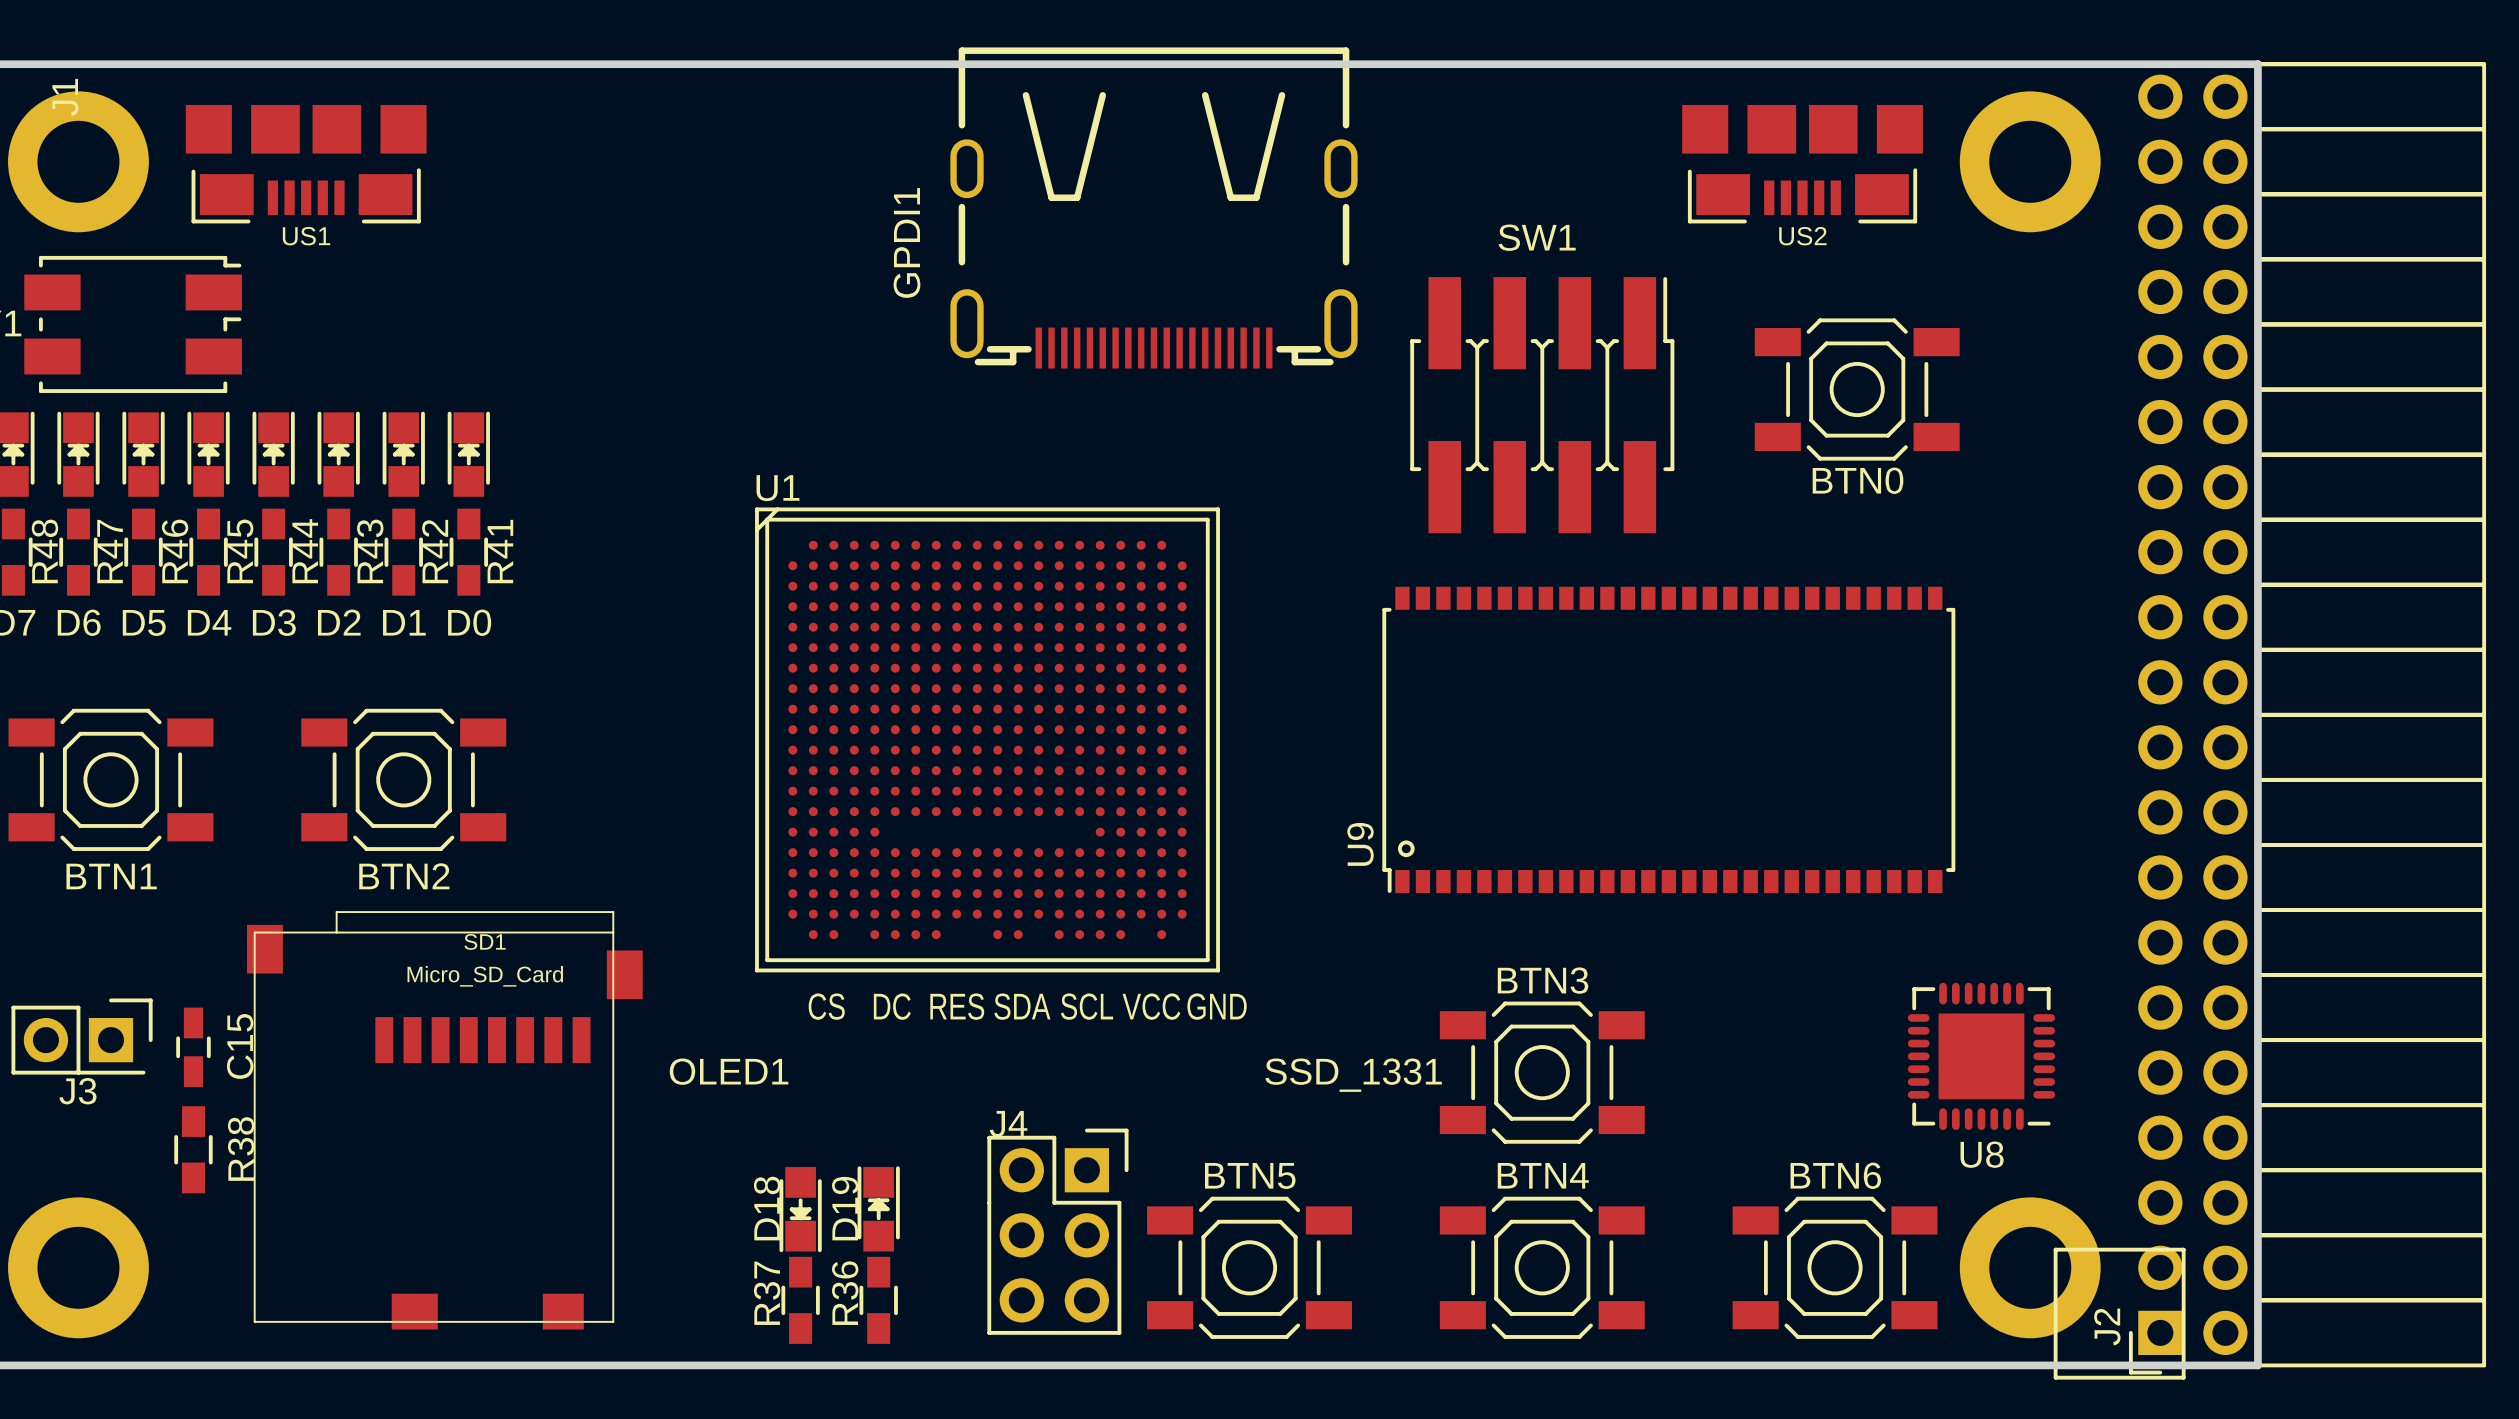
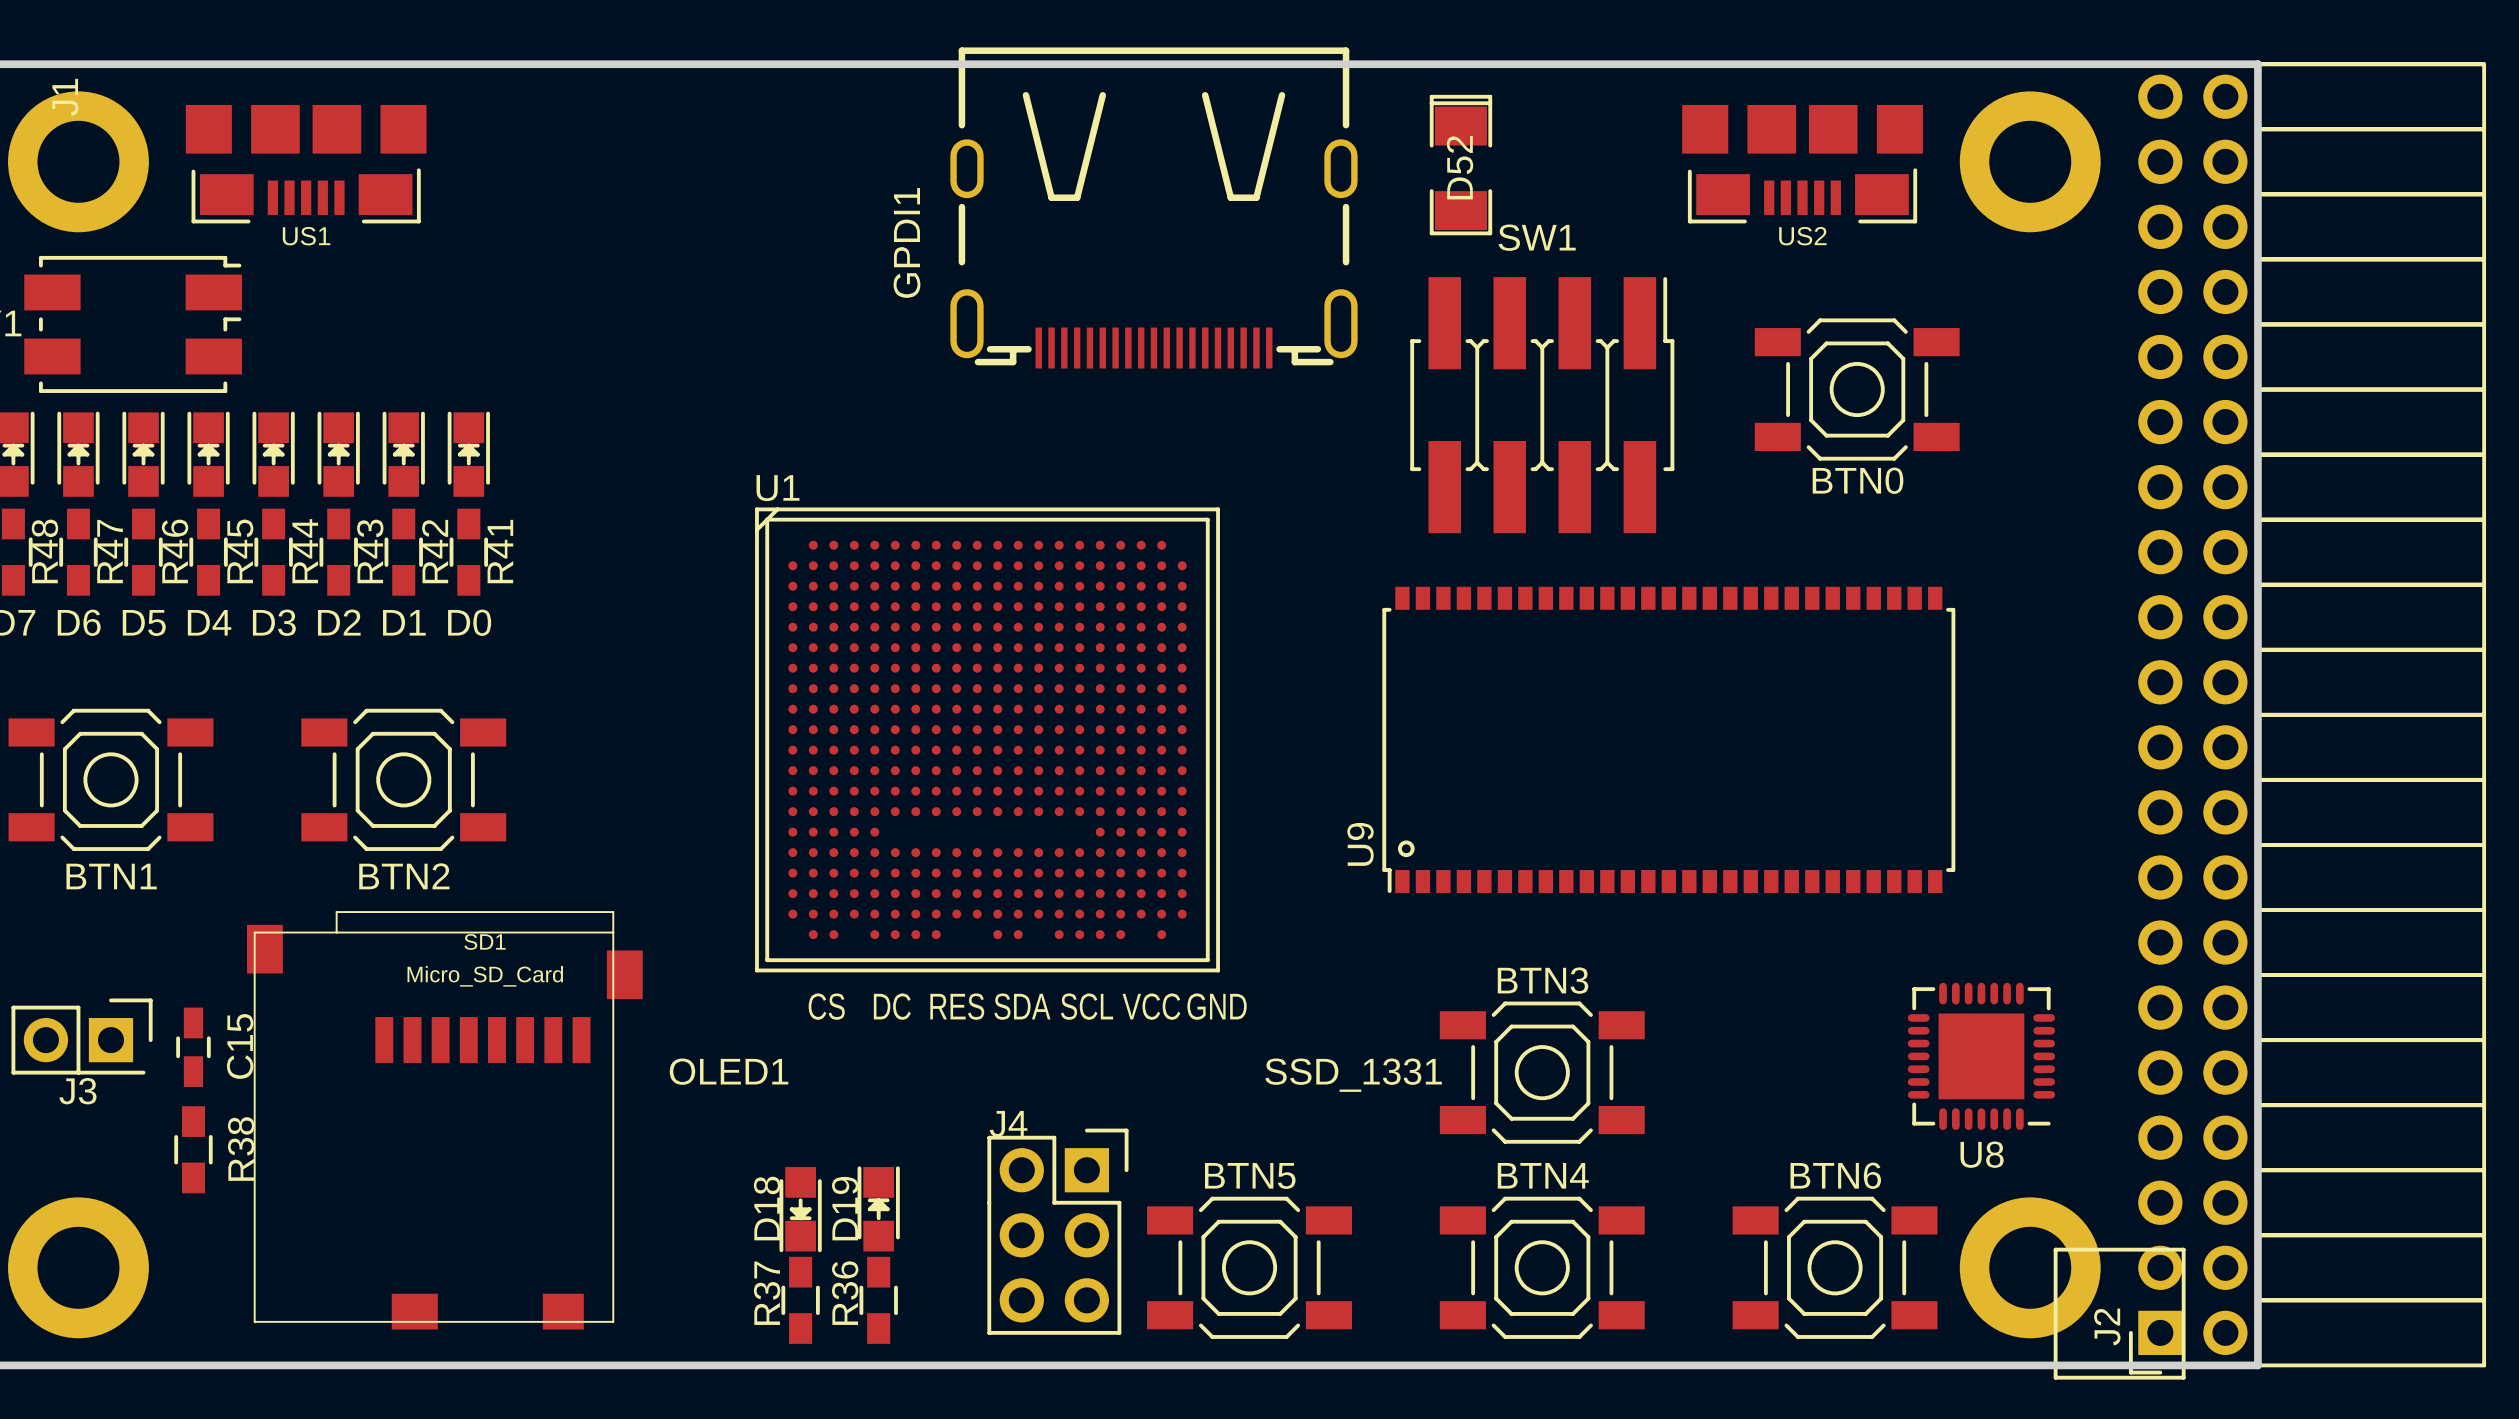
D52: none -> (1460, 165)

